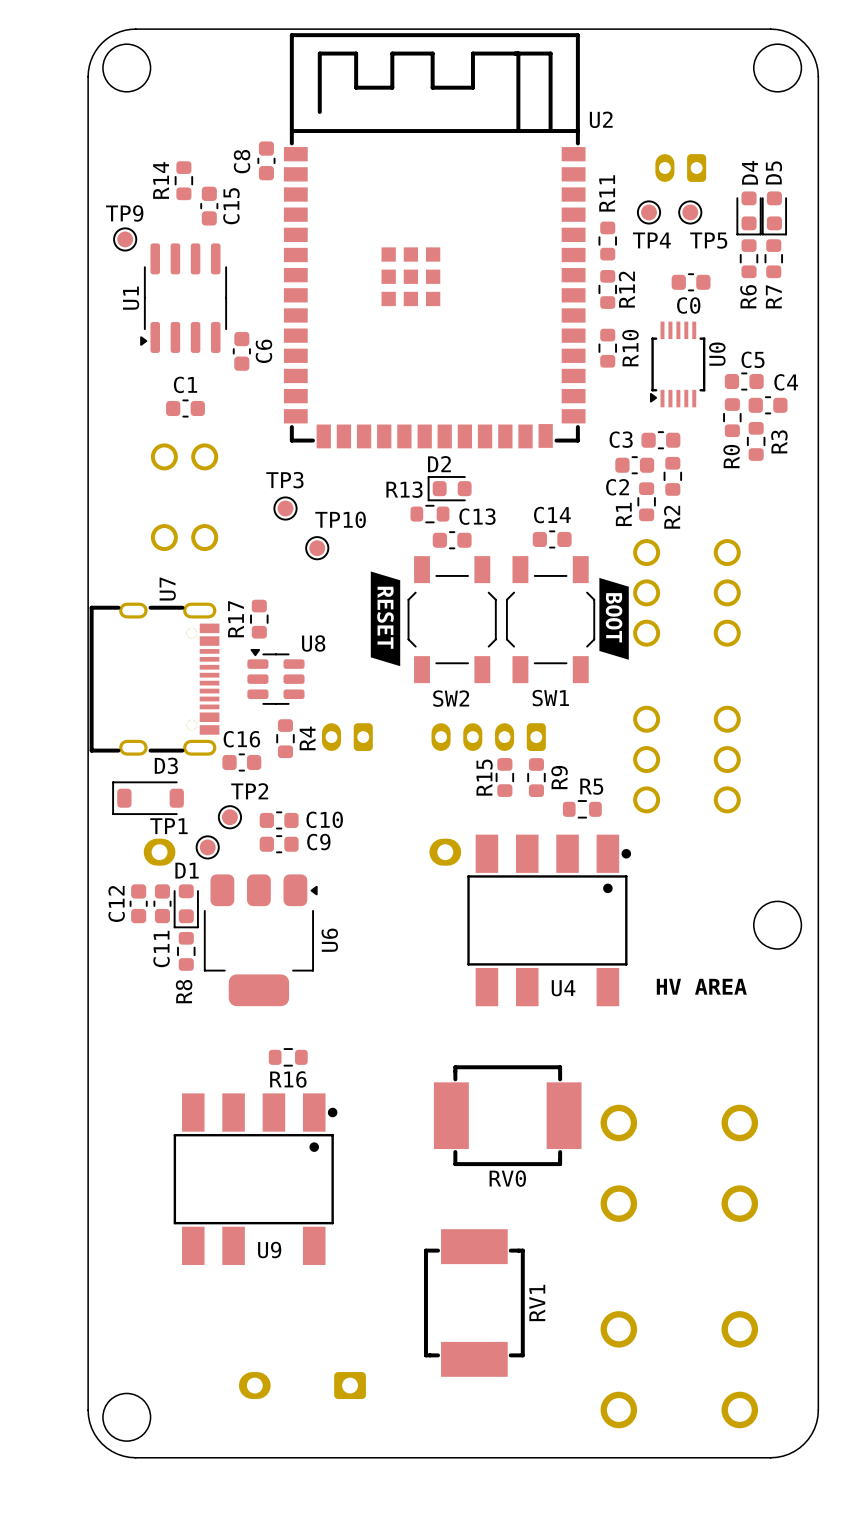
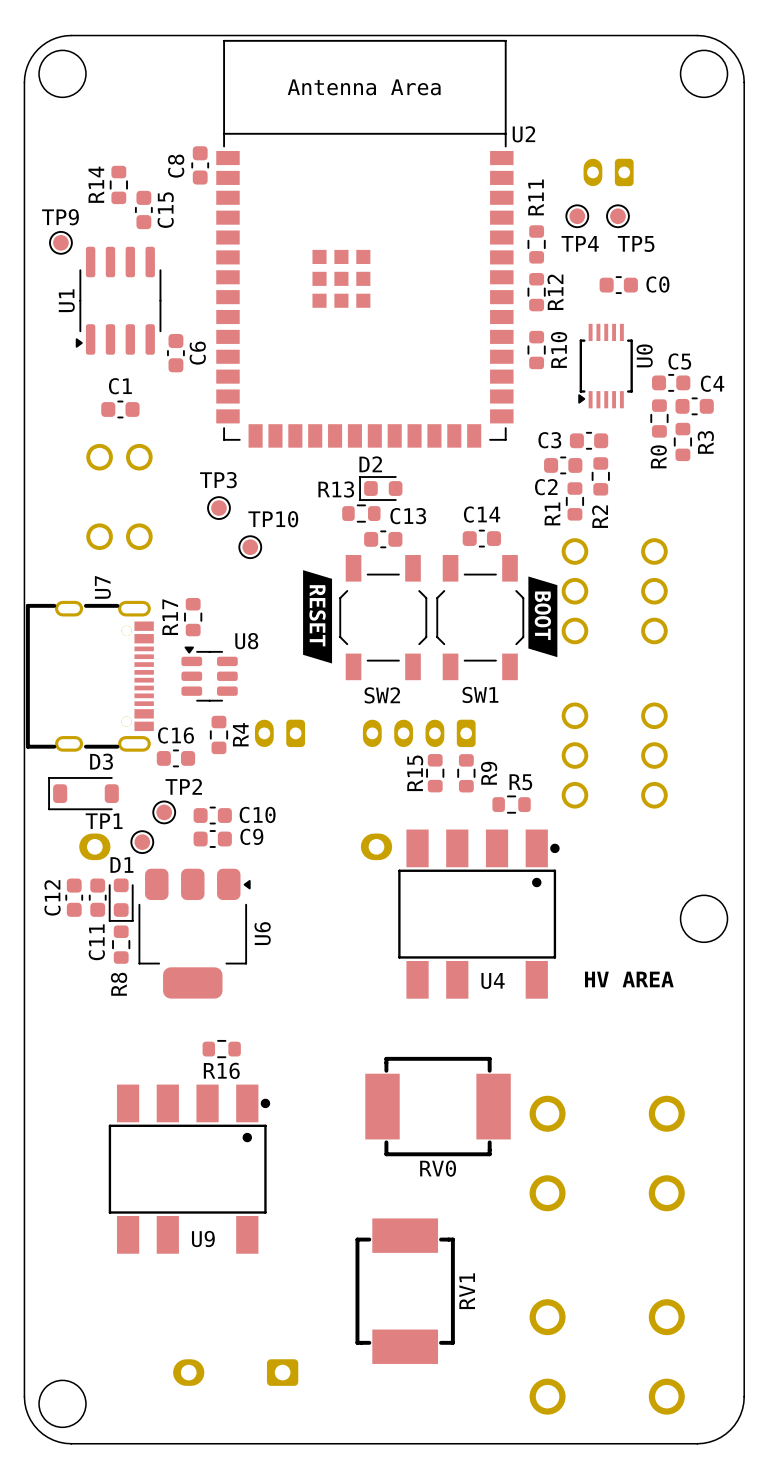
U2 footprint: [283, 33, 586, 449] -> [216, 39, 514, 448]
D4: (749, 213) -> none
D5: (774, 213) -> none
R6: (749, 258) -> none
R7: (773, 258) -> none
C0 name position: C0 (688, 305) -> C0 (657, 284)

